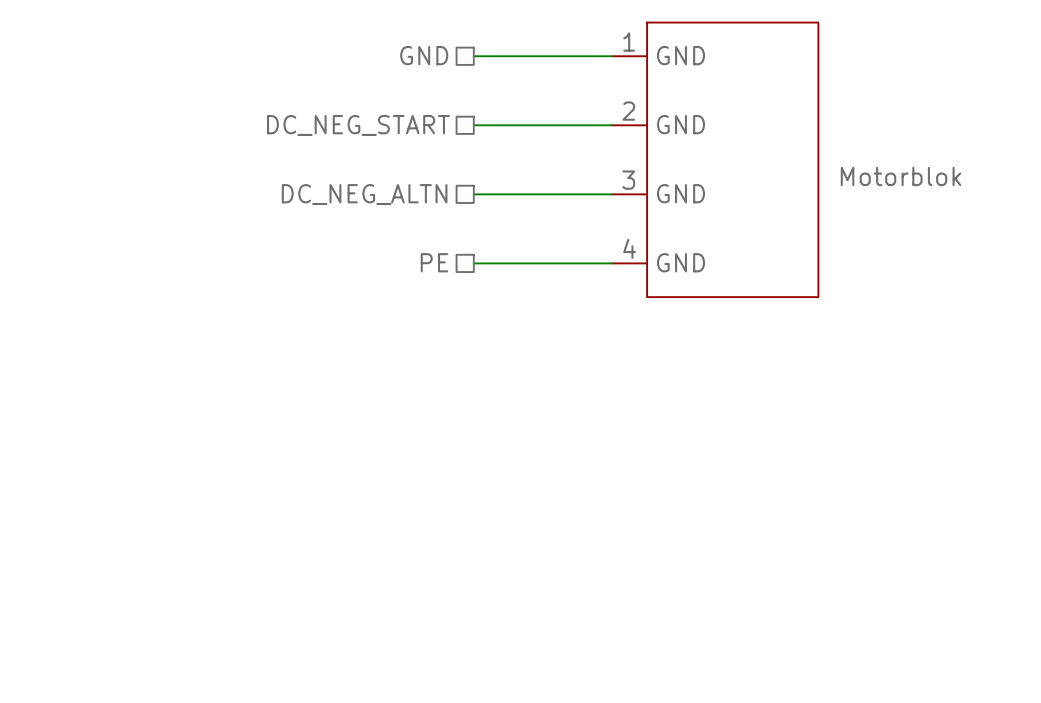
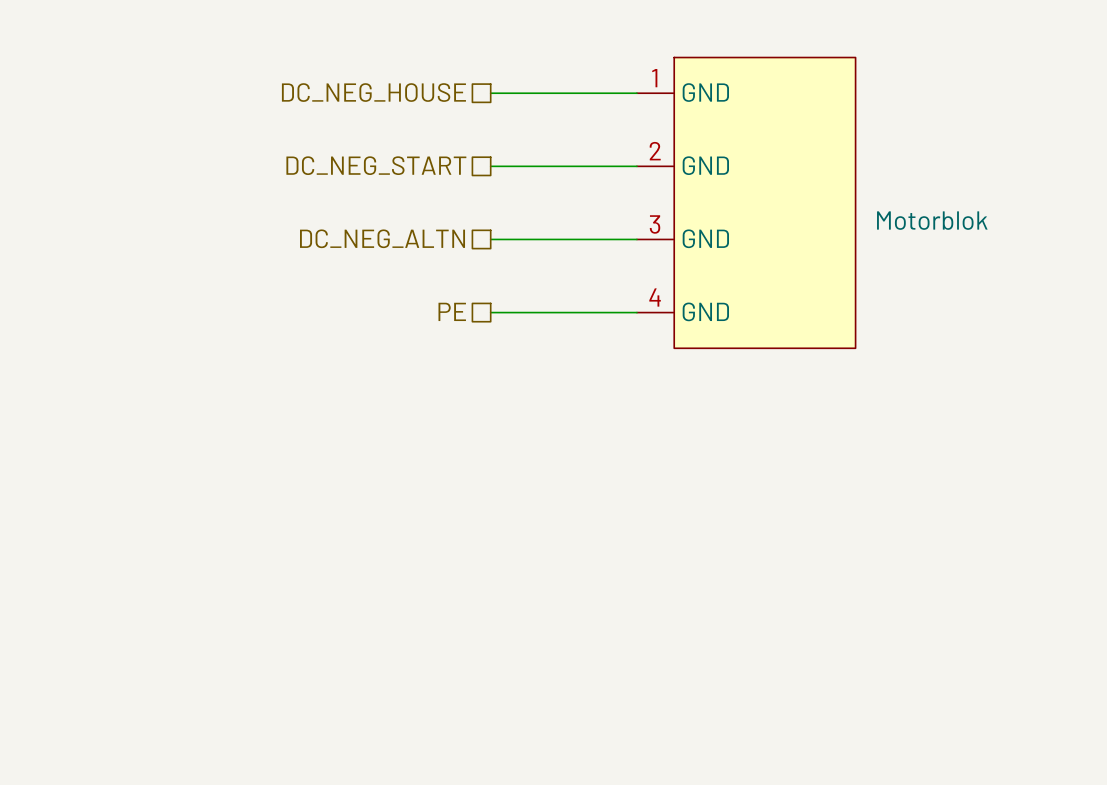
hierarchical label: GND (424, 55) -> DC_NEG_HOUSE (373, 92)

